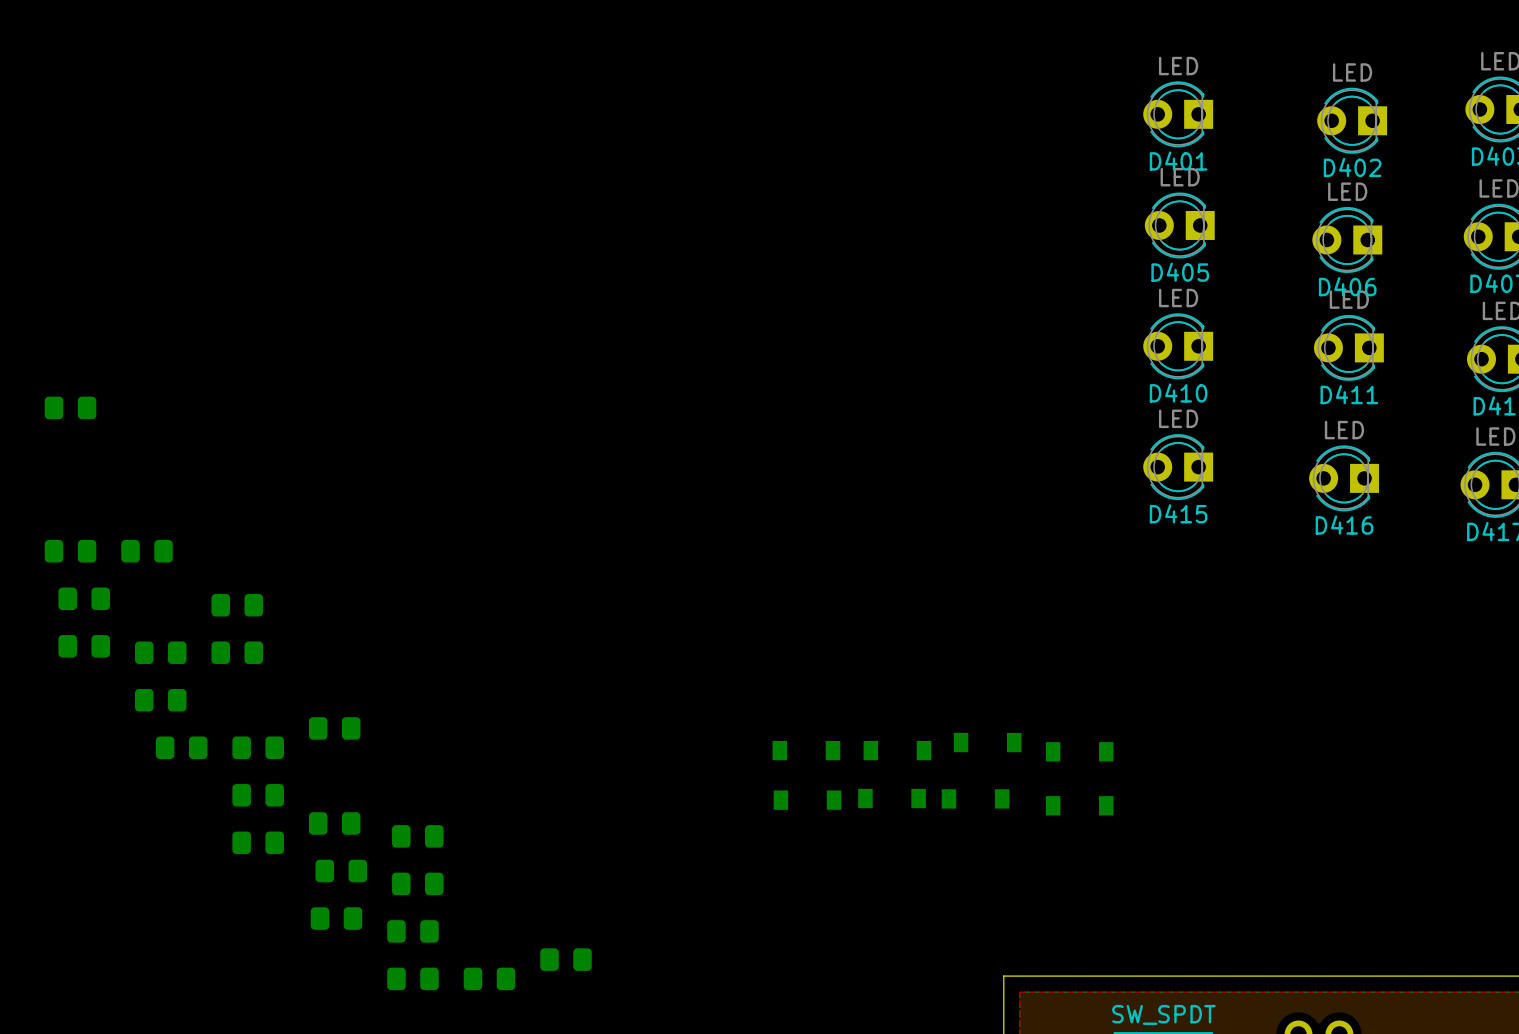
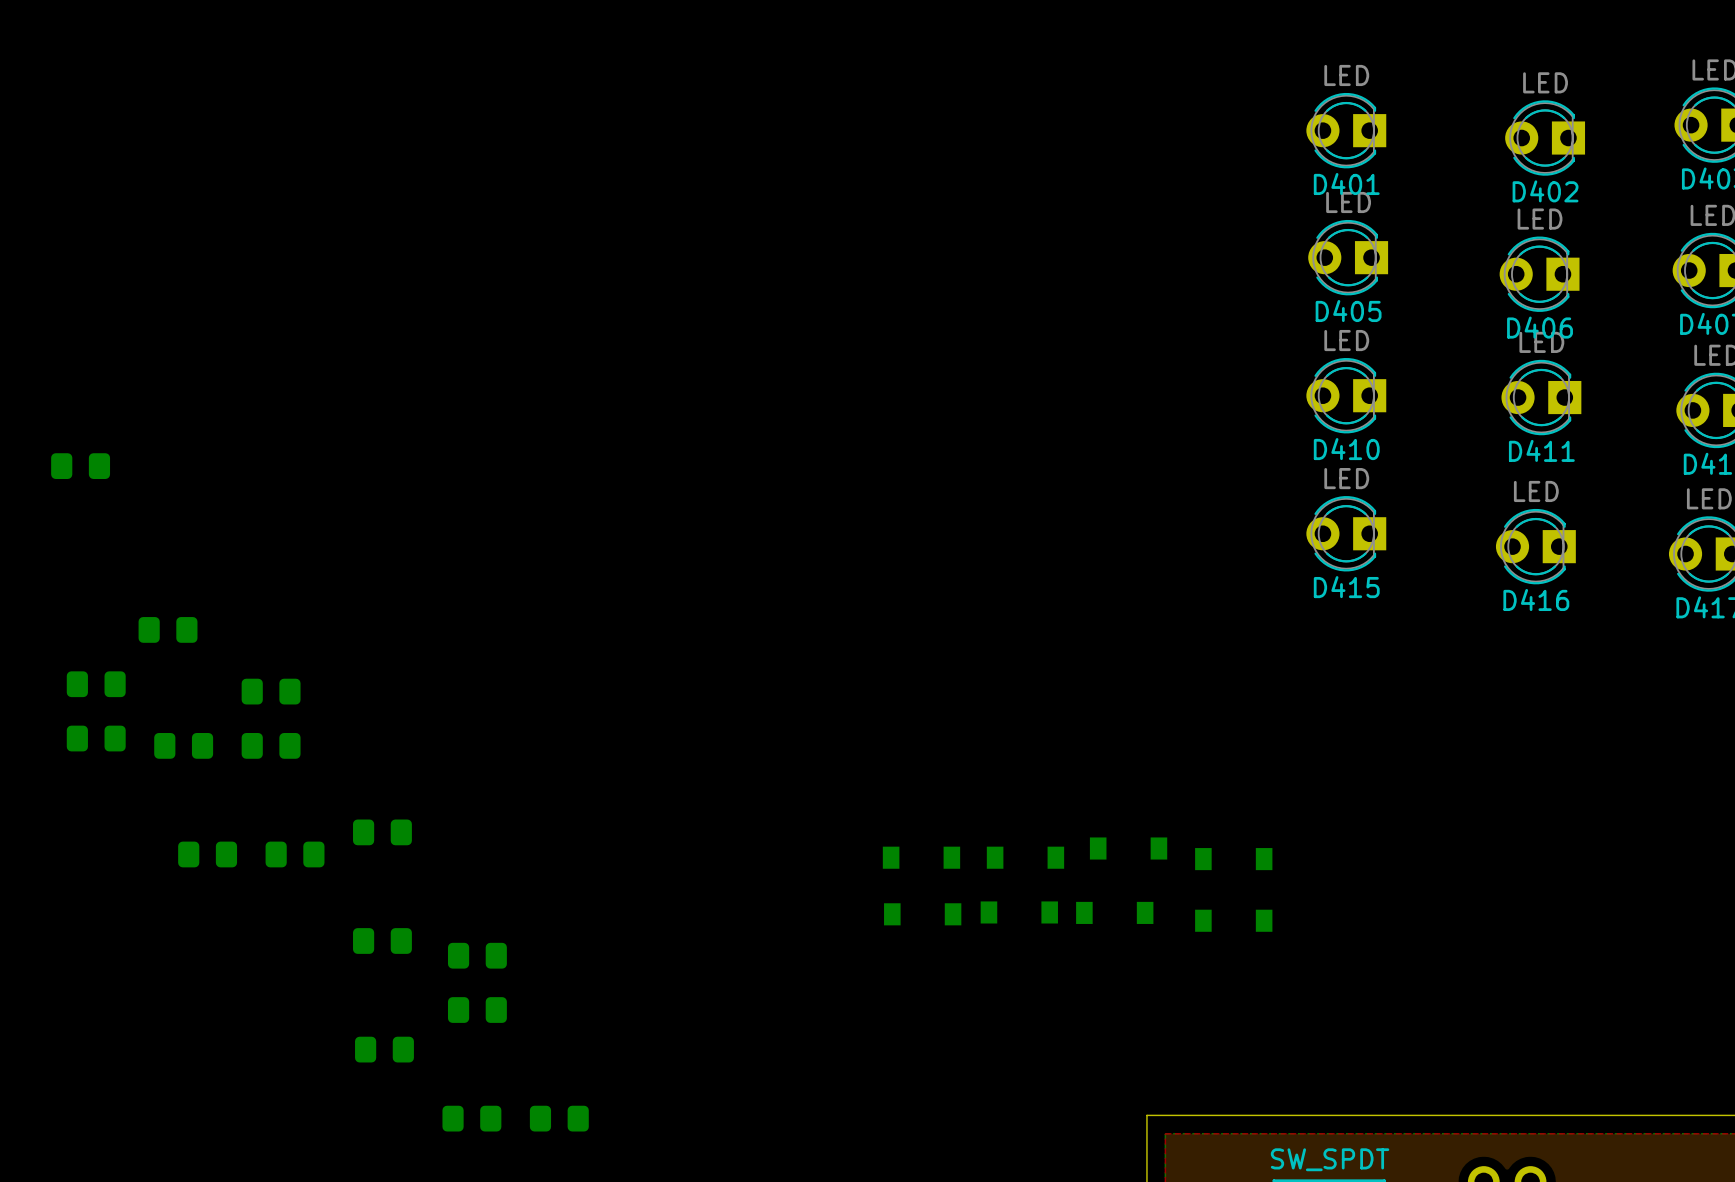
part: (70, 551) -> none
part: (160, 700) -> none
part: (258, 795) -> none
part: (258, 842) -> none
part: (341, 871) -> none
part: (412, 931) -> none
part: (566, 959) -> none

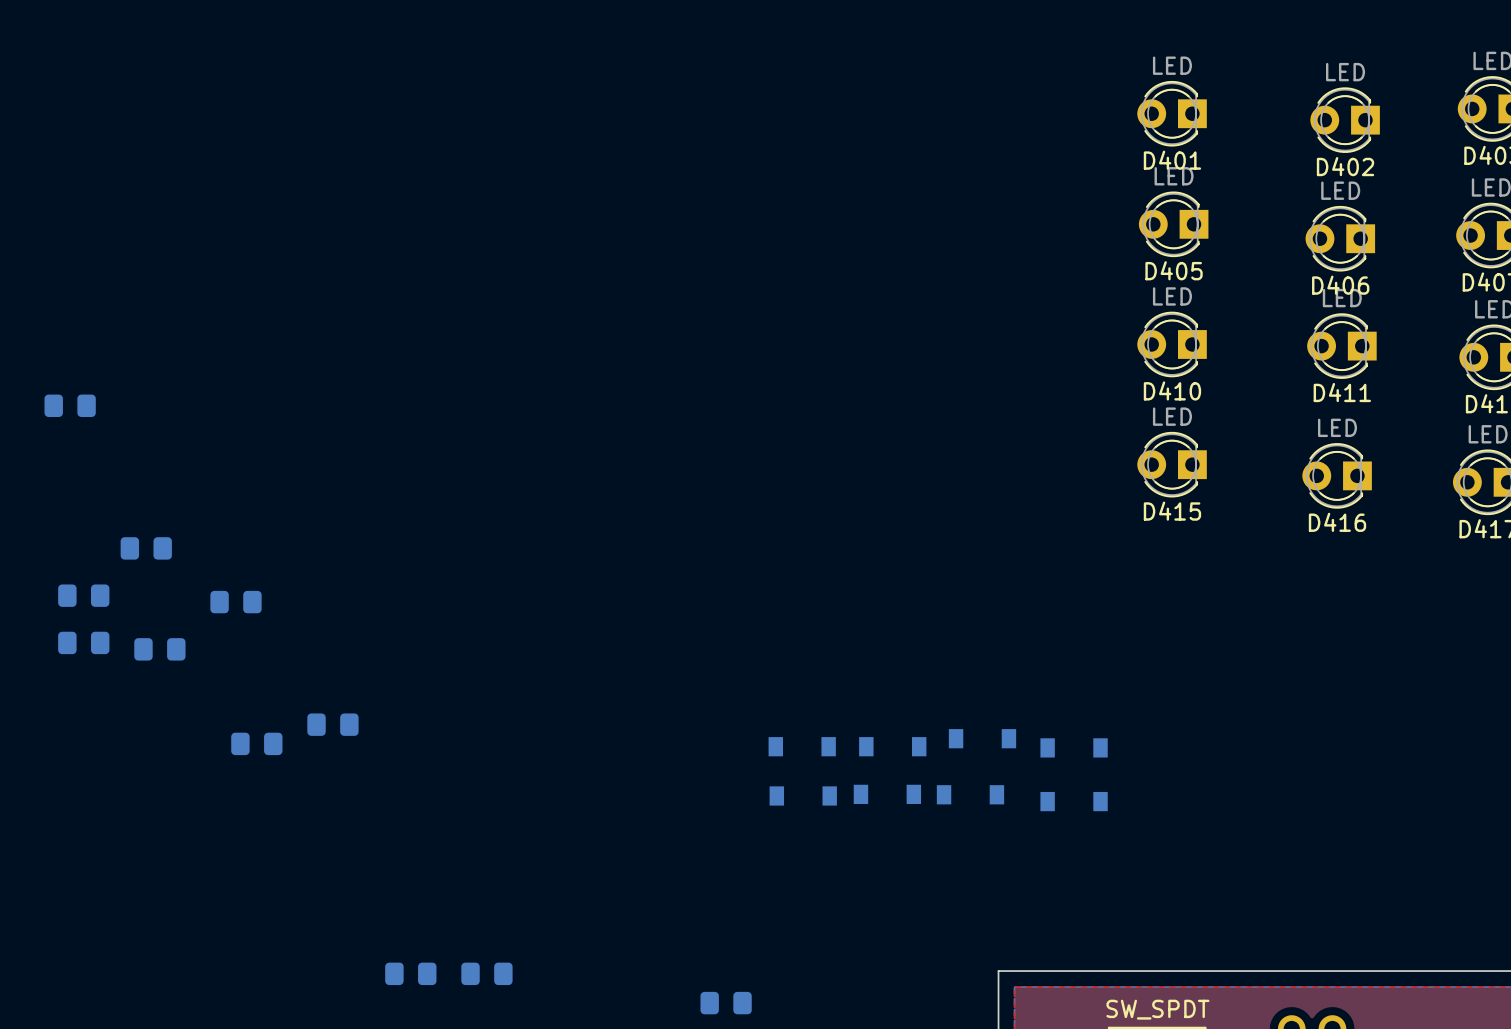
part: (271, 745) -> none
part: (207, 854) -> none
part: (382, 940) -> none
part: (477, 955) -> none
part: (477, 1010) -> none
part: (384, 1049) -> none
part: none -> (726, 1003)

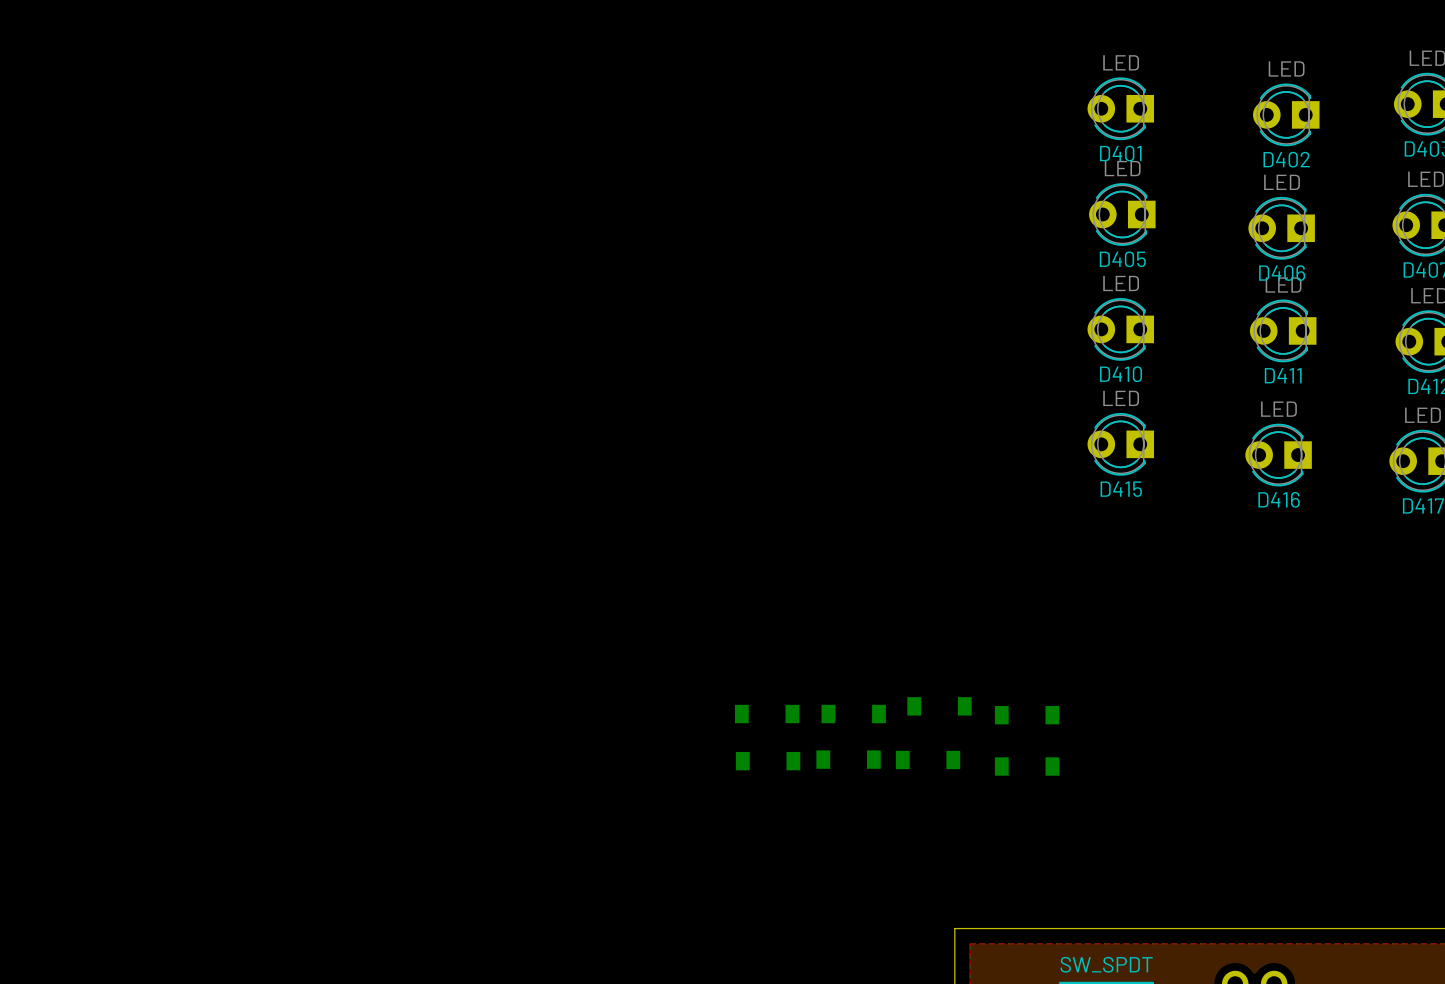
part: (70, 405) -> none
part: (146, 548) -> none
part: (83, 595) -> none
part: (236, 602) -> none
part: (83, 642) -> none
part: (159, 649) -> none
part: (332, 724) -> none
part: (256, 743) -> none
part: (410, 973) -> none
part: (486, 973) -> none
part: (726, 1003) -> none

